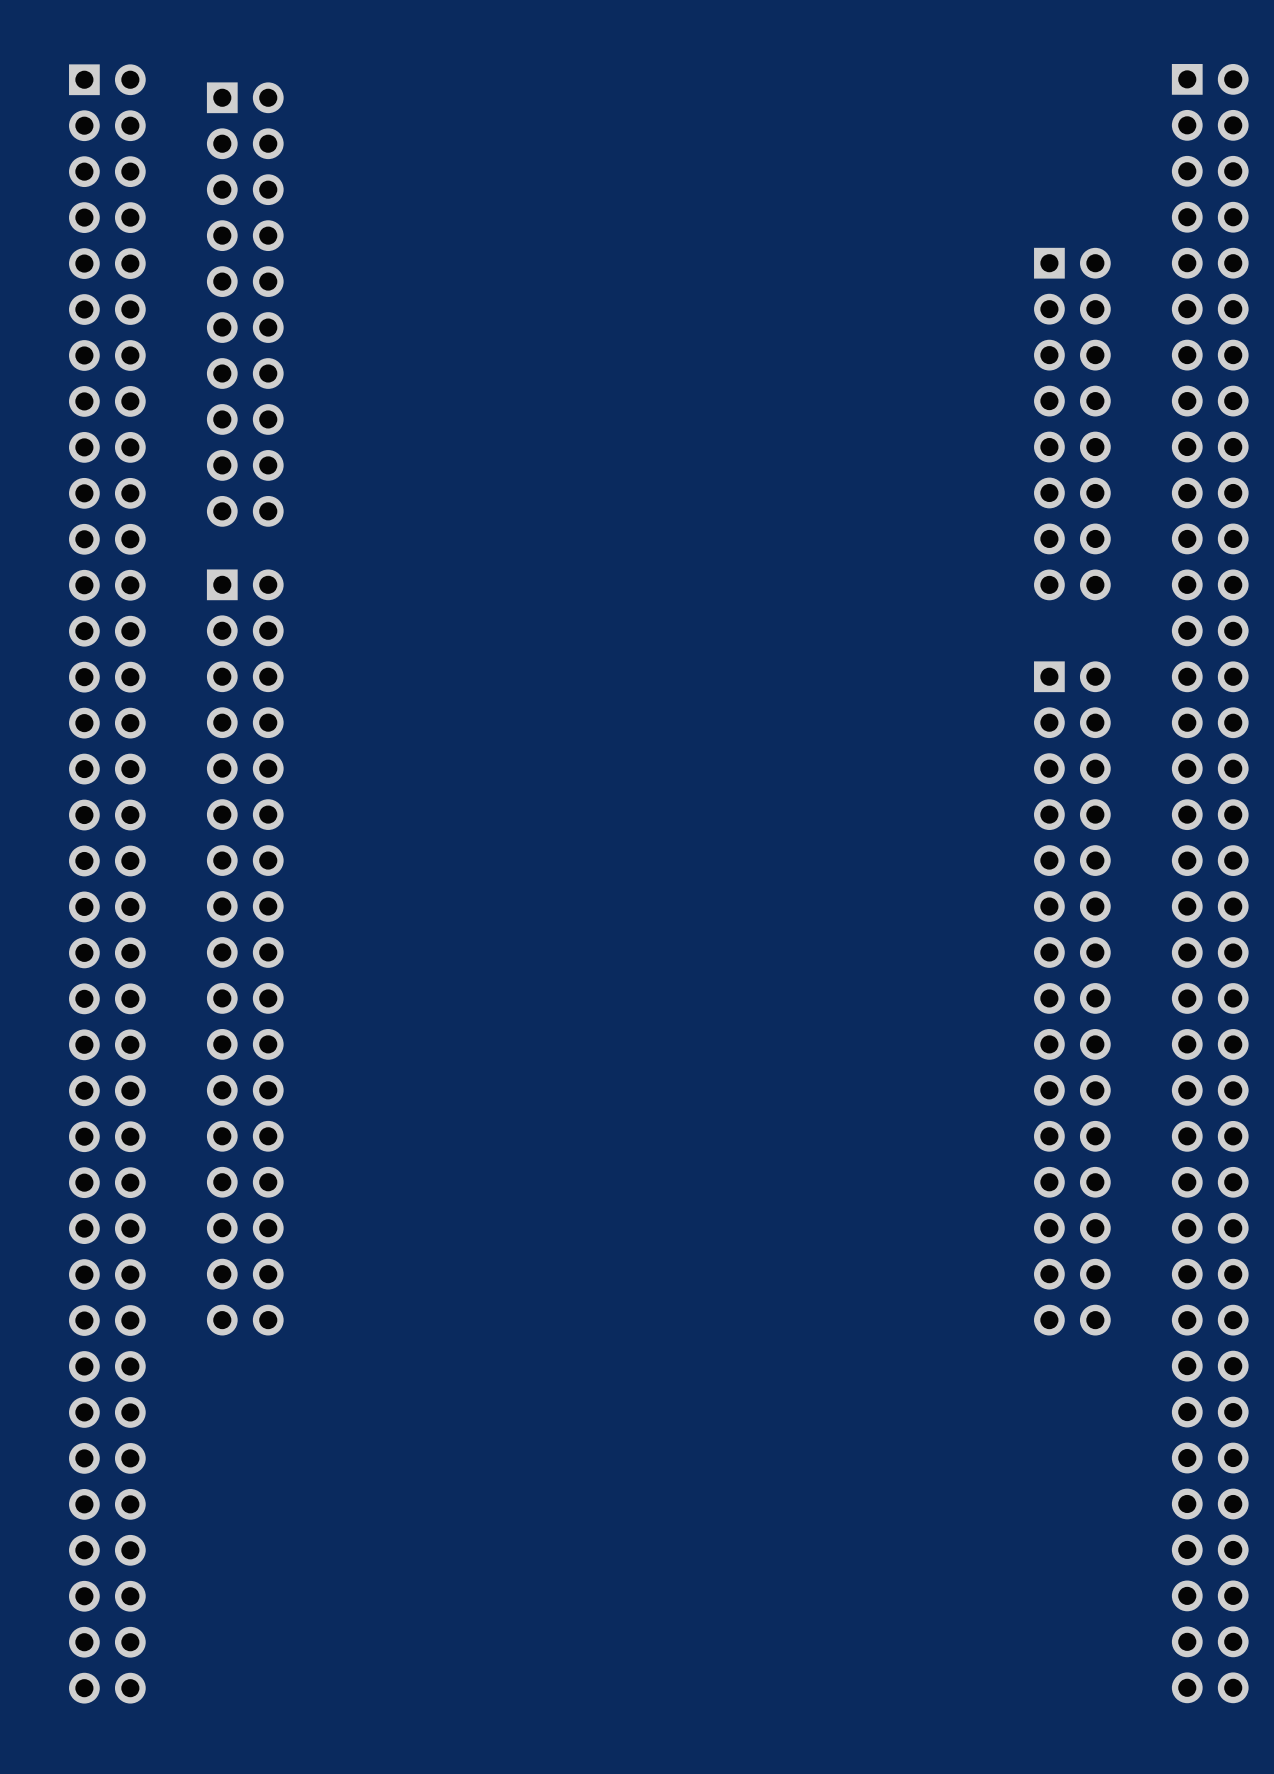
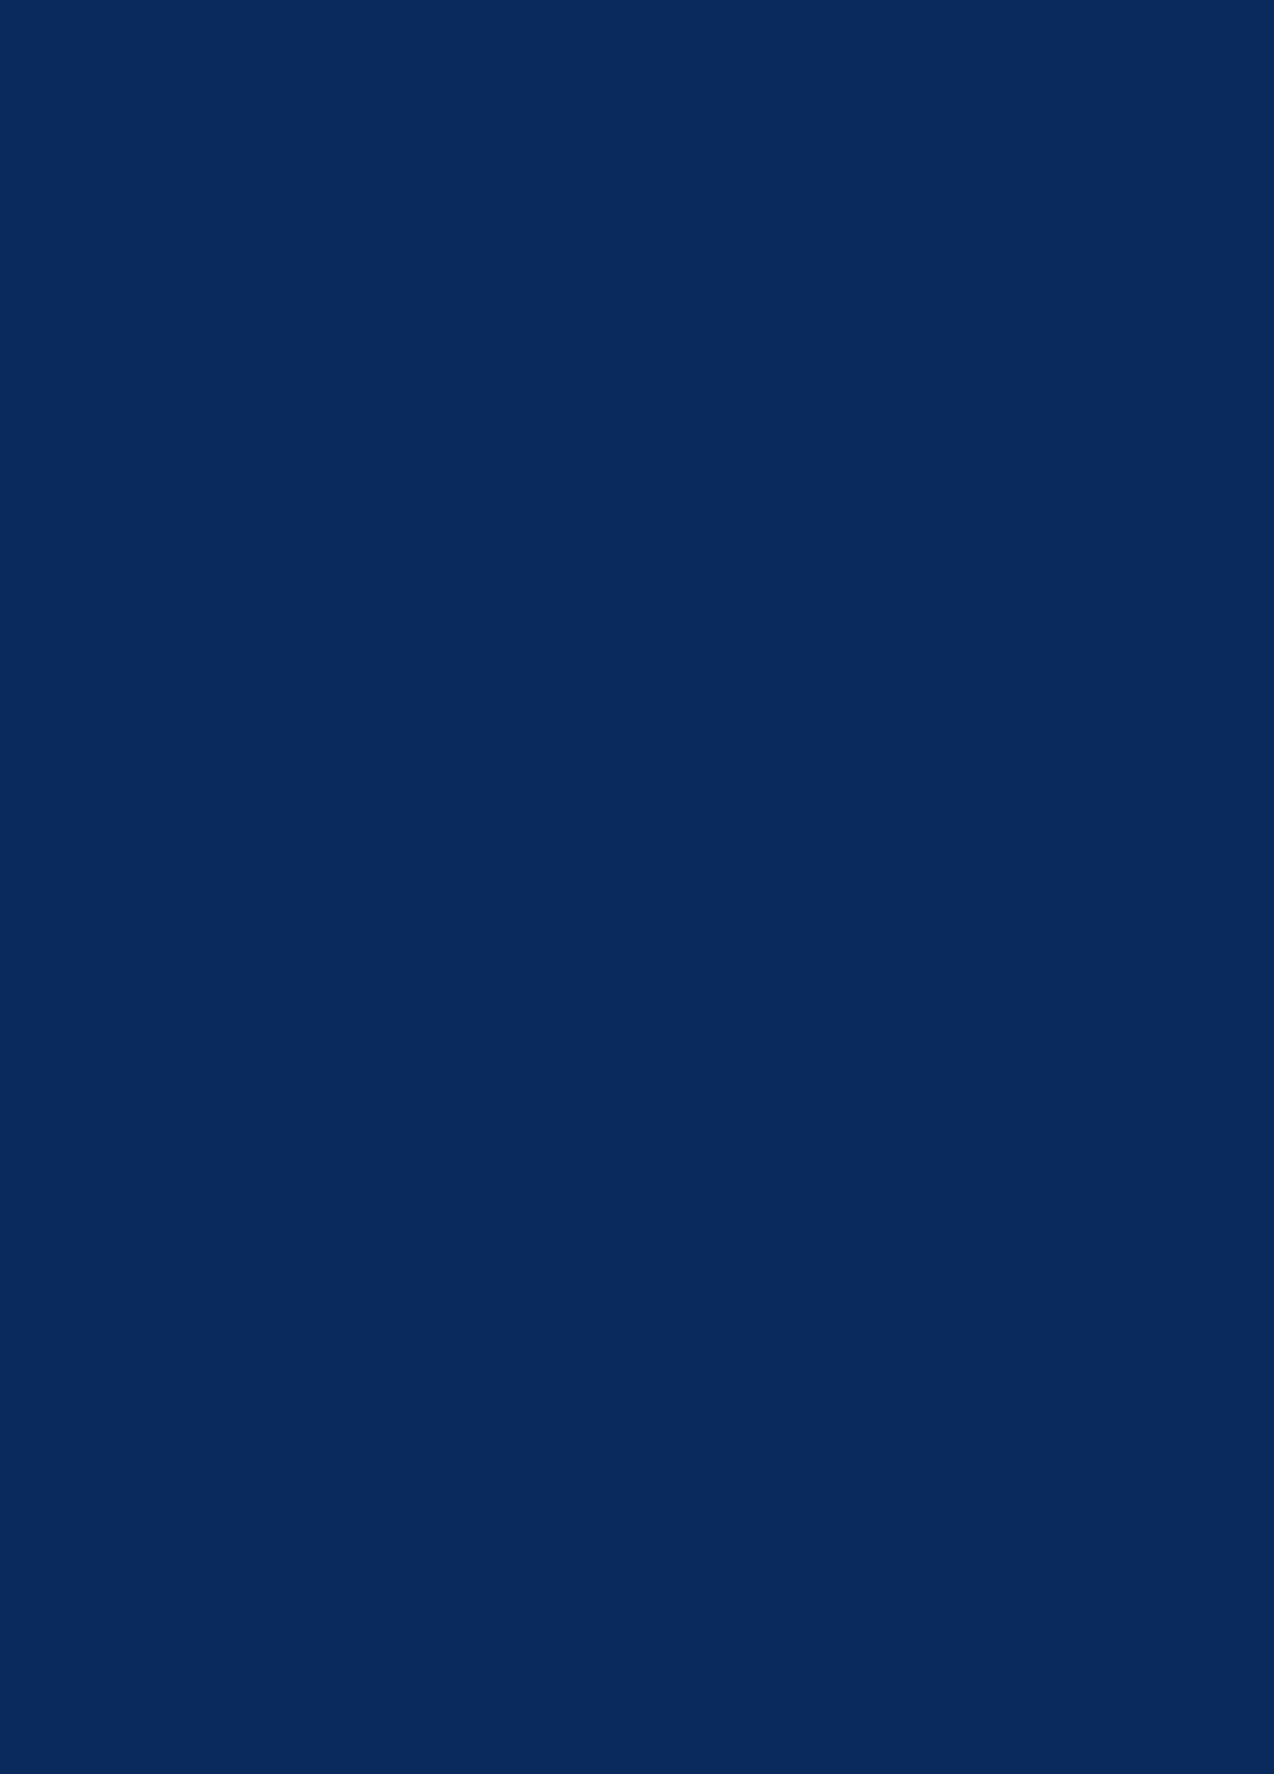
part: (245, 304) -> none
part: (1072, 424) -> none
part: (107, 883) -> none
part: (1210, 883) -> none
part: (245, 952) -> none
part: (1072, 998) -> none

